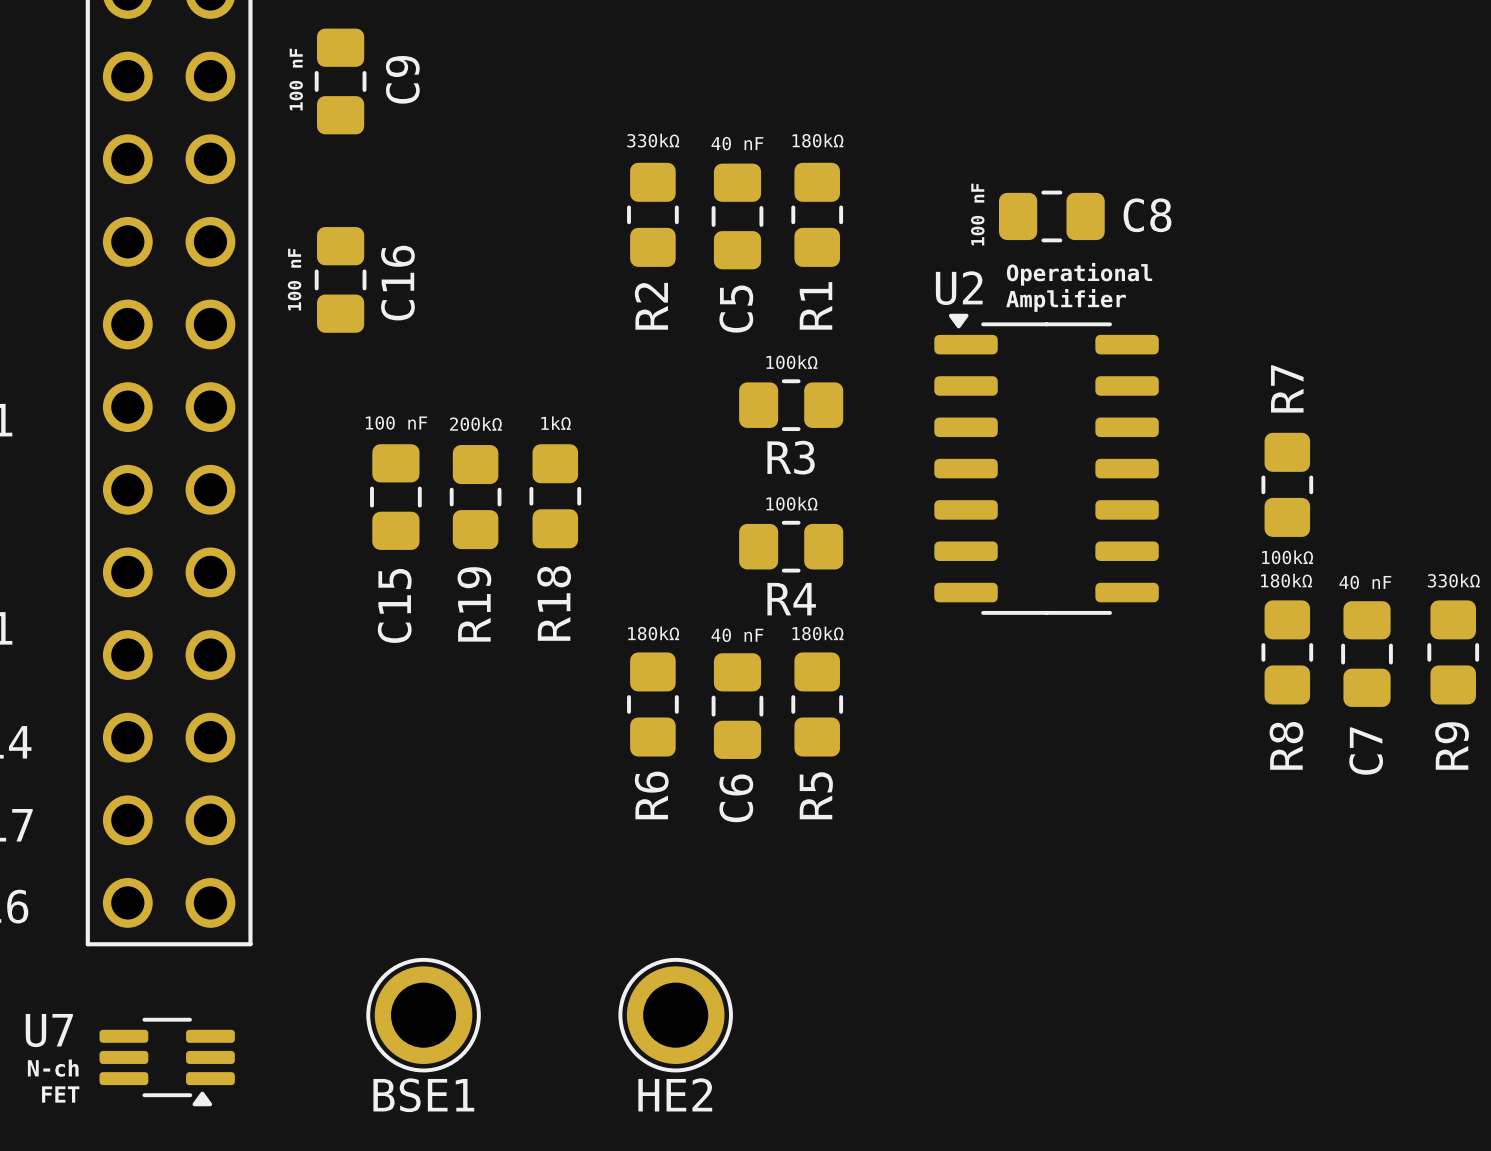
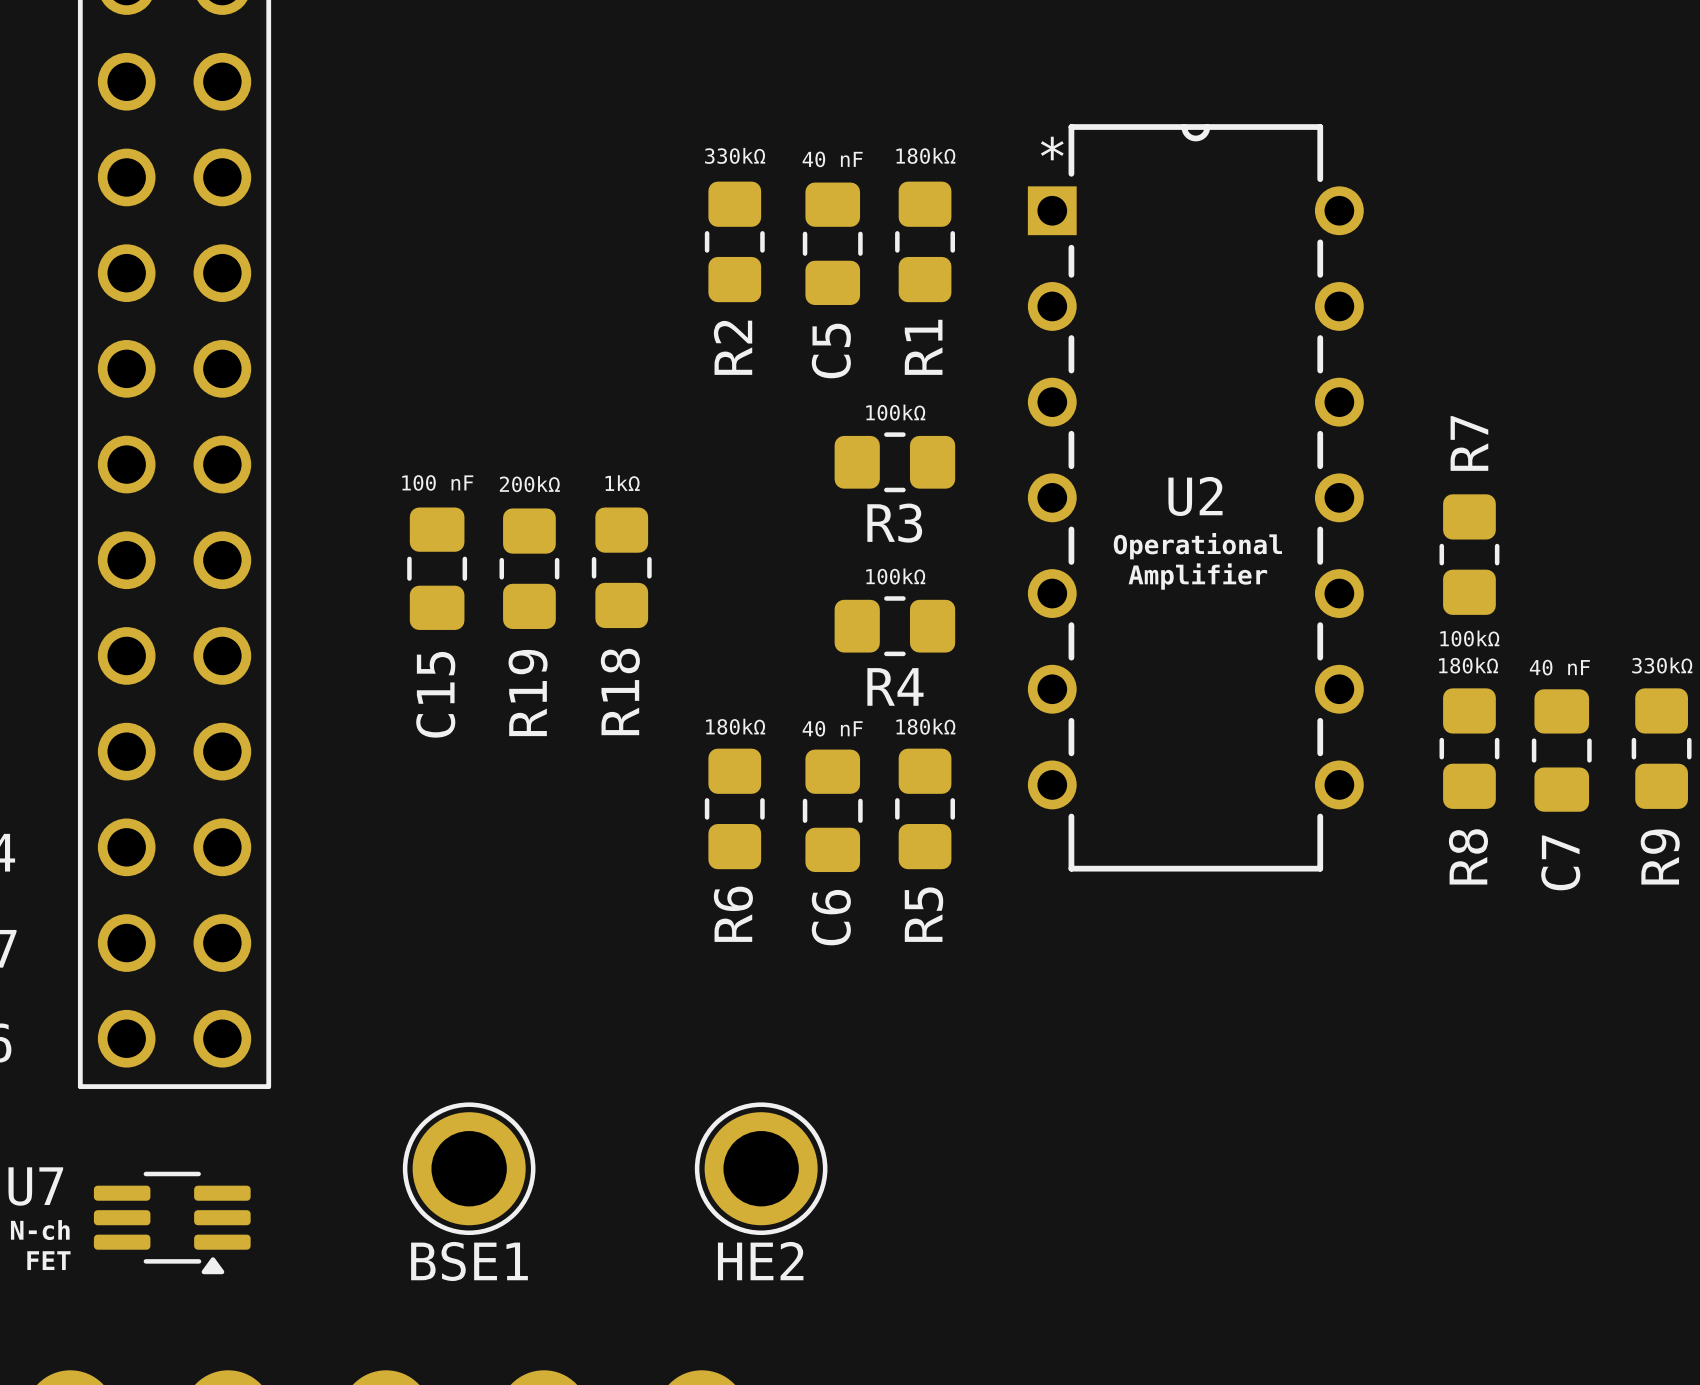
C9: 100 nF (340, 81) -> none
C8: 100 nF (1051, 216) -> none
text position: Operational (1079, 274) -> Operational (1197, 546)
C16: 100 nF (340, 279) -> none
U2 name position: U2 (959, 288) -> U2 (1195, 496)
text position: Amplifier (1066, 300) -> Amplifier (1197, 576)
U2 footprint: [934, 313, 1159, 615] -> [1027, 124, 1364, 872]

